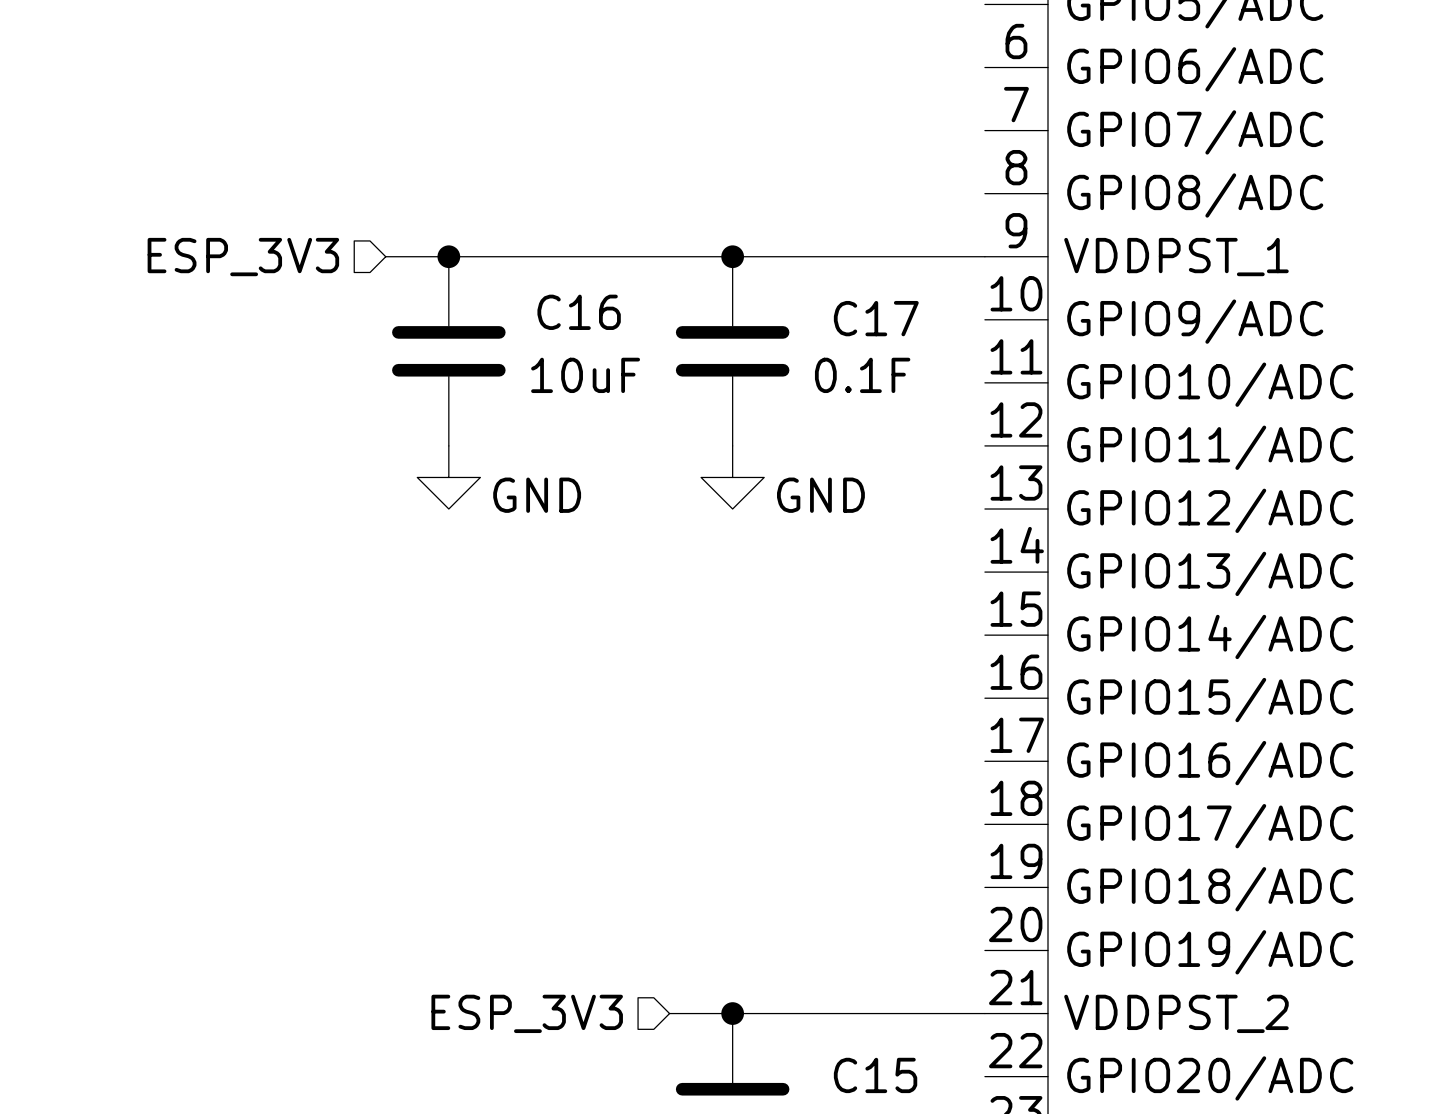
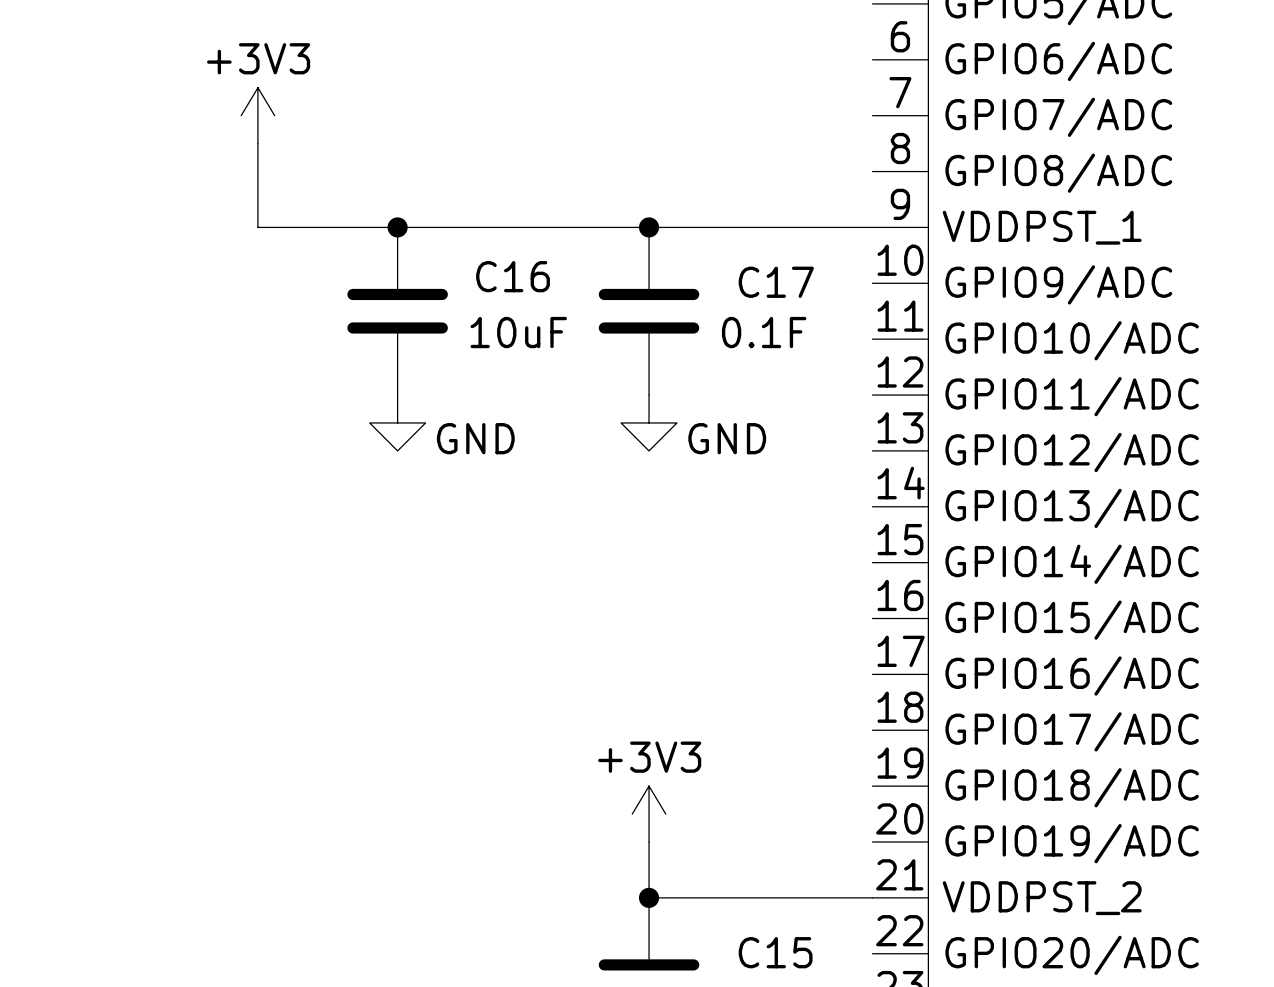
power symbol: none -> +3V3 (257, 115)
wire: none -> (257, 143) (257, 227) (341, 227)
hierarchical label: ESP_3V3 (243, 257) -> none
power symbol: none -> +3V3 (649, 814)
hierarchical label: ESP_3V3 (527, 1013) -> none
wire: (669, 1013) (732, 1013) -> (649, 842) (649, 897)

